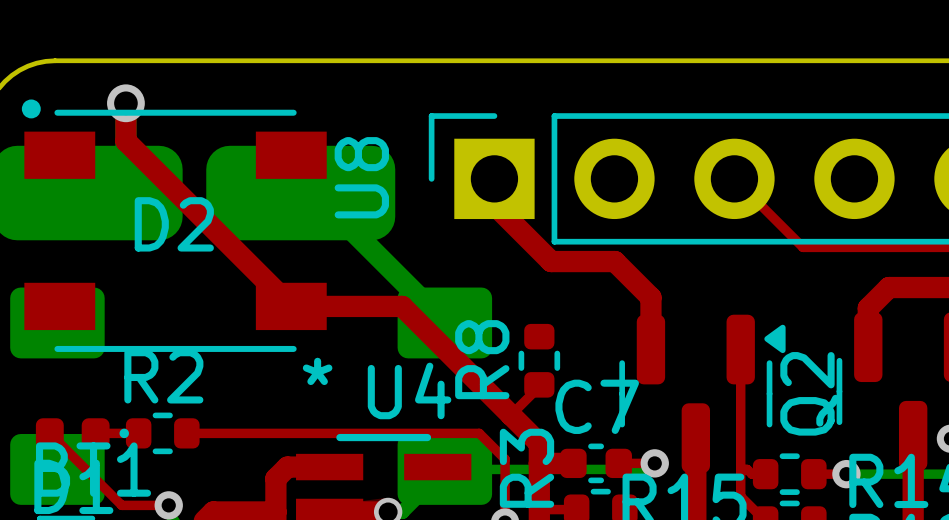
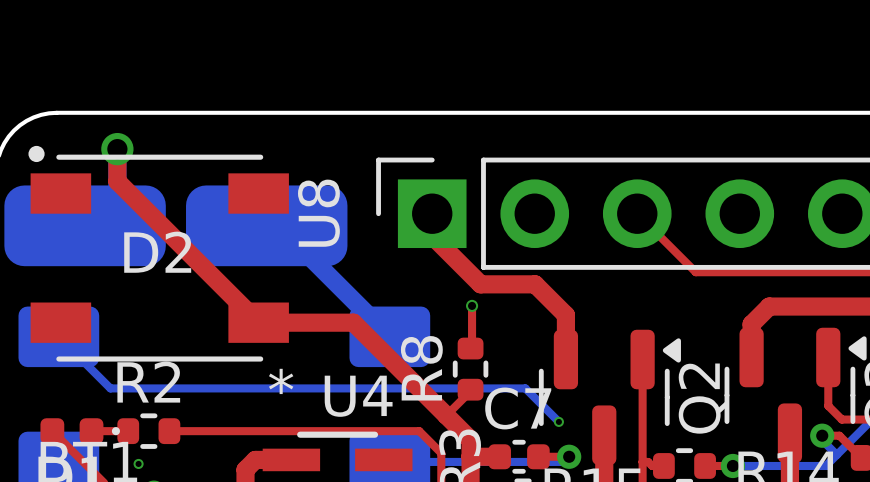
top track: none -> (472, 305) (470, 348)
via: none -> (472, 305)
bottom track: none -> (58, 336) (110, 388) (525, 388) (558, 421)
via: none -> (558, 421)
via: none -> (138, 463)

